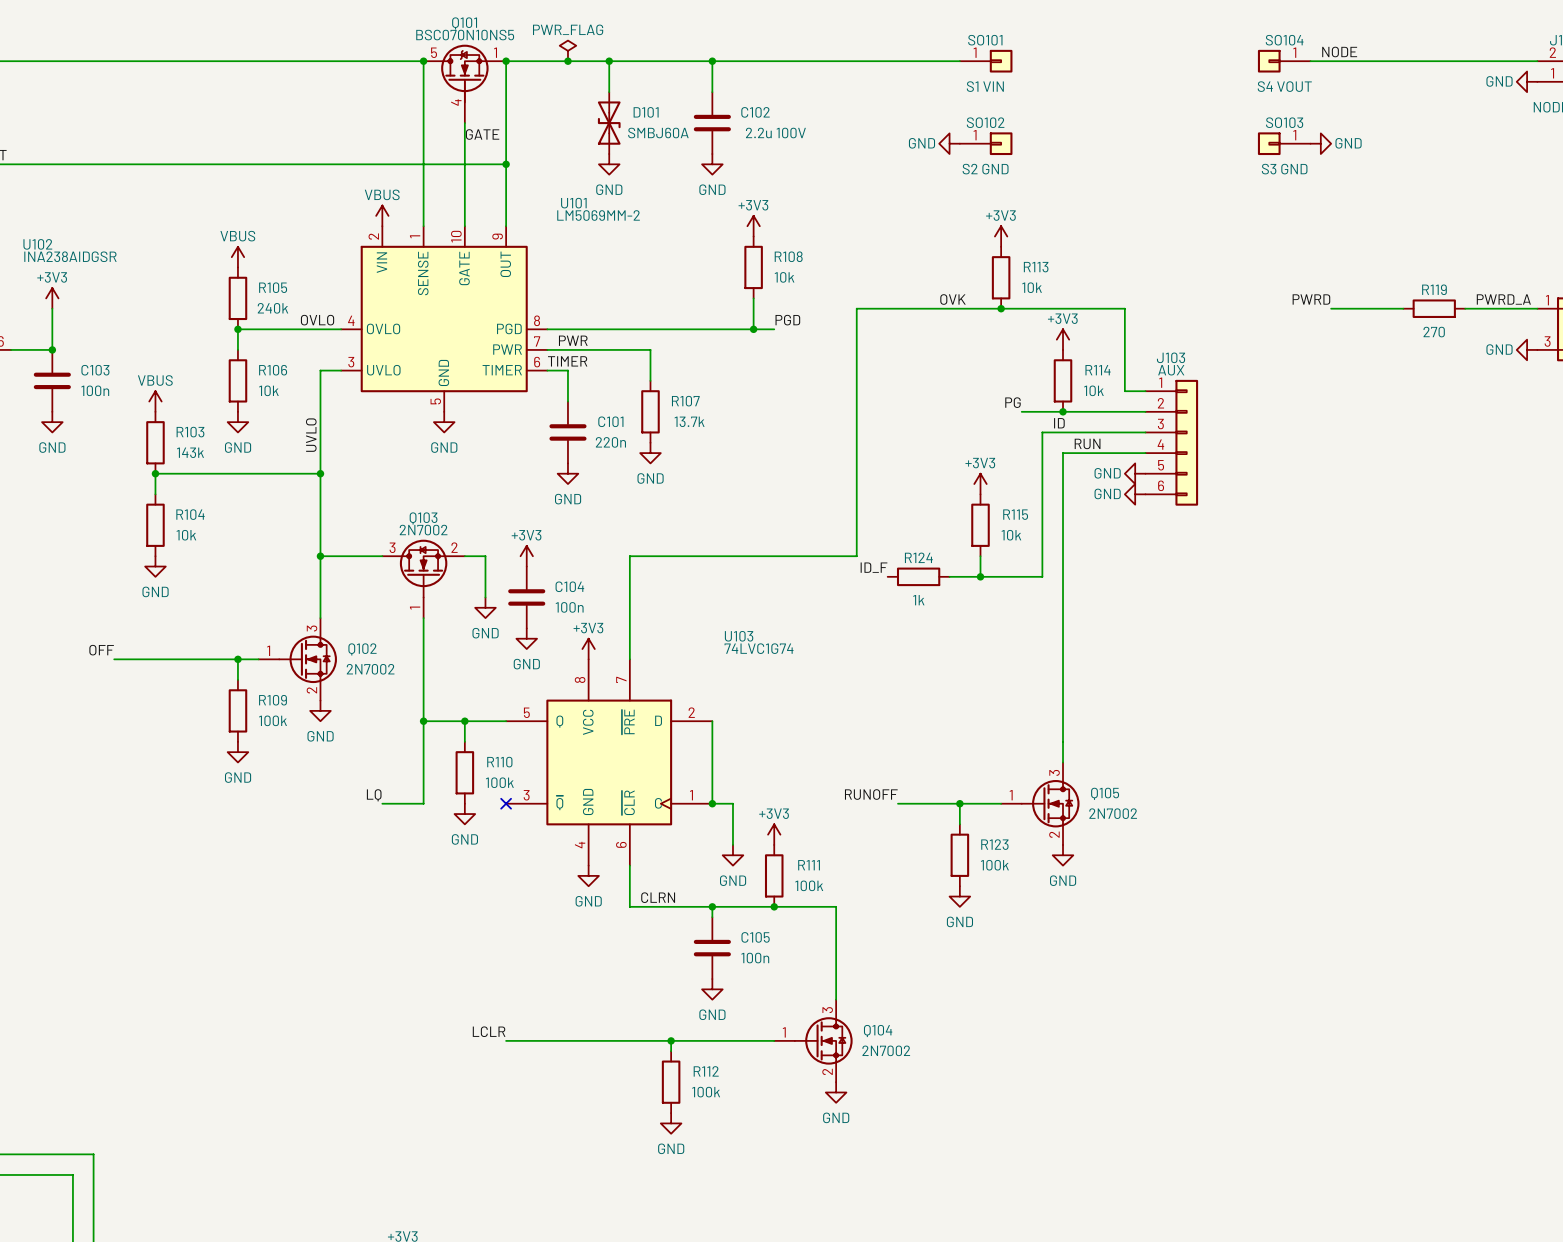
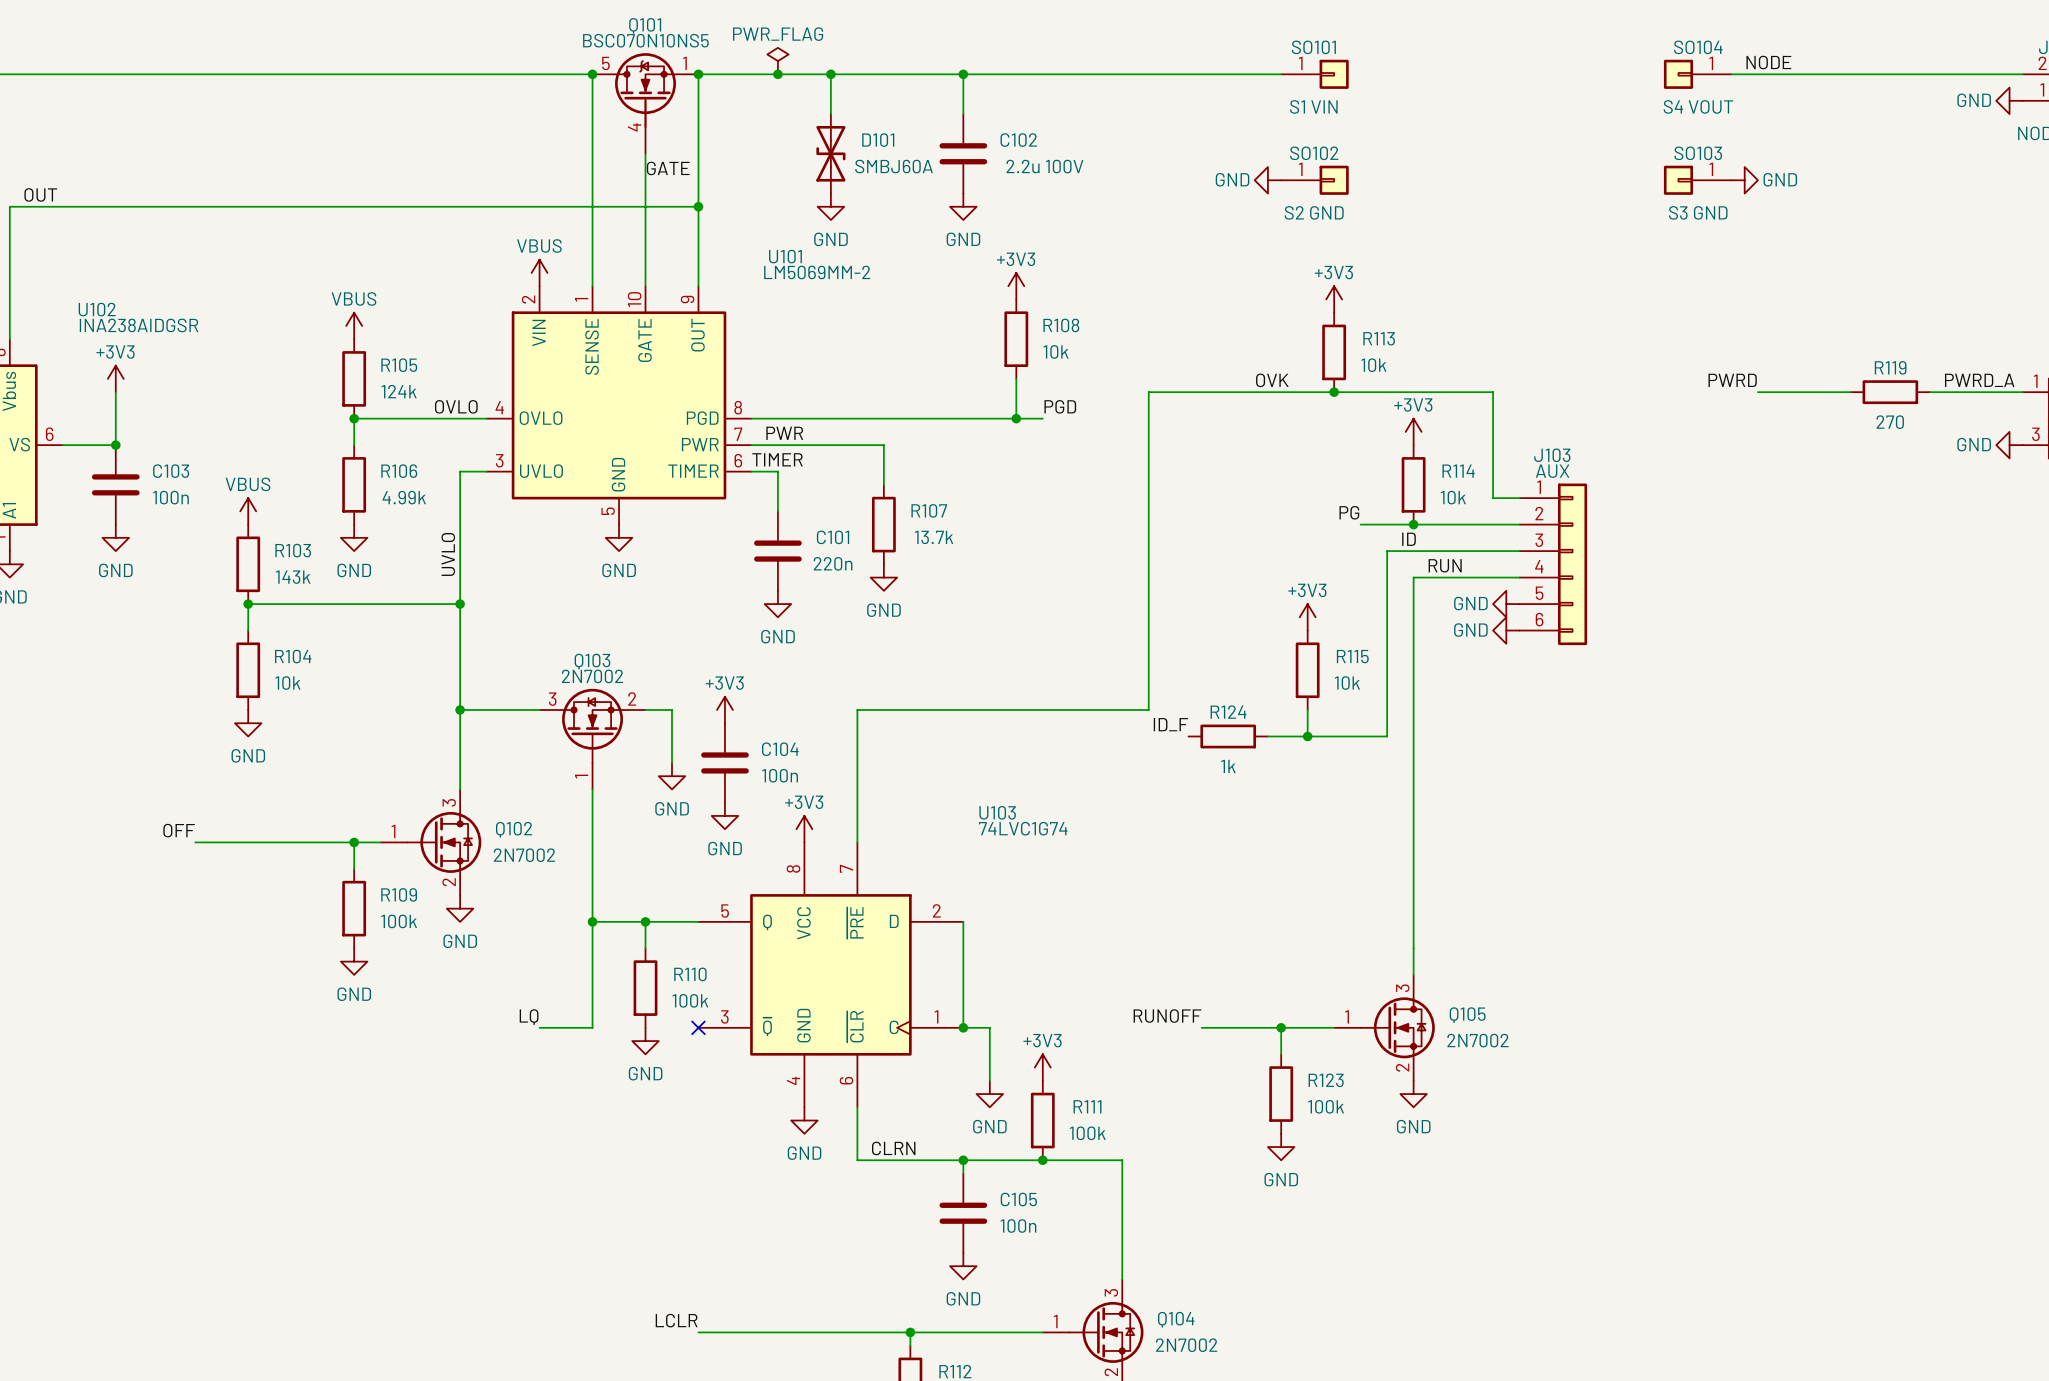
R105 value: 240k (272, 308) -> 124k (399, 391)
R106 value: 10k (268, 390) -> 4.99k (404, 497)

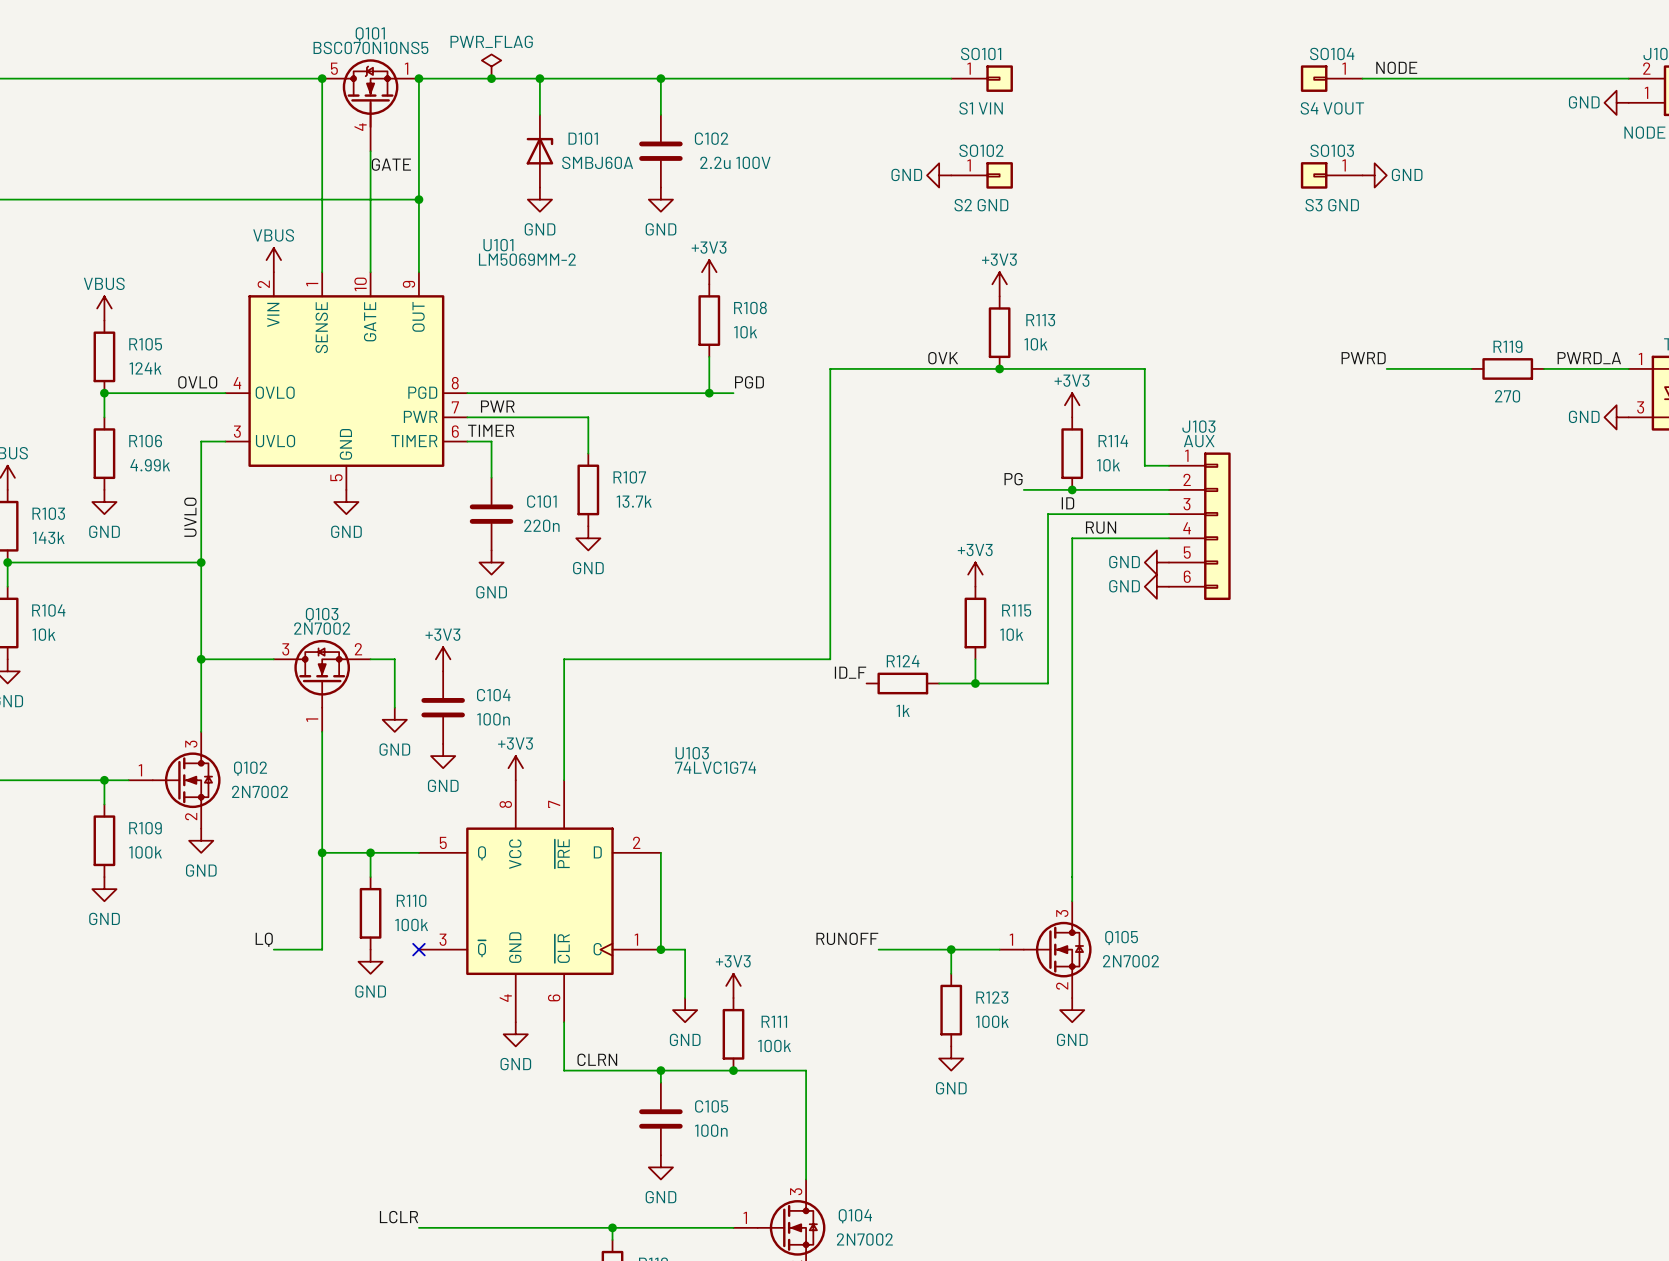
D101 symbol: [816, 114, 846, 194] -> [526, 114, 554, 188]

